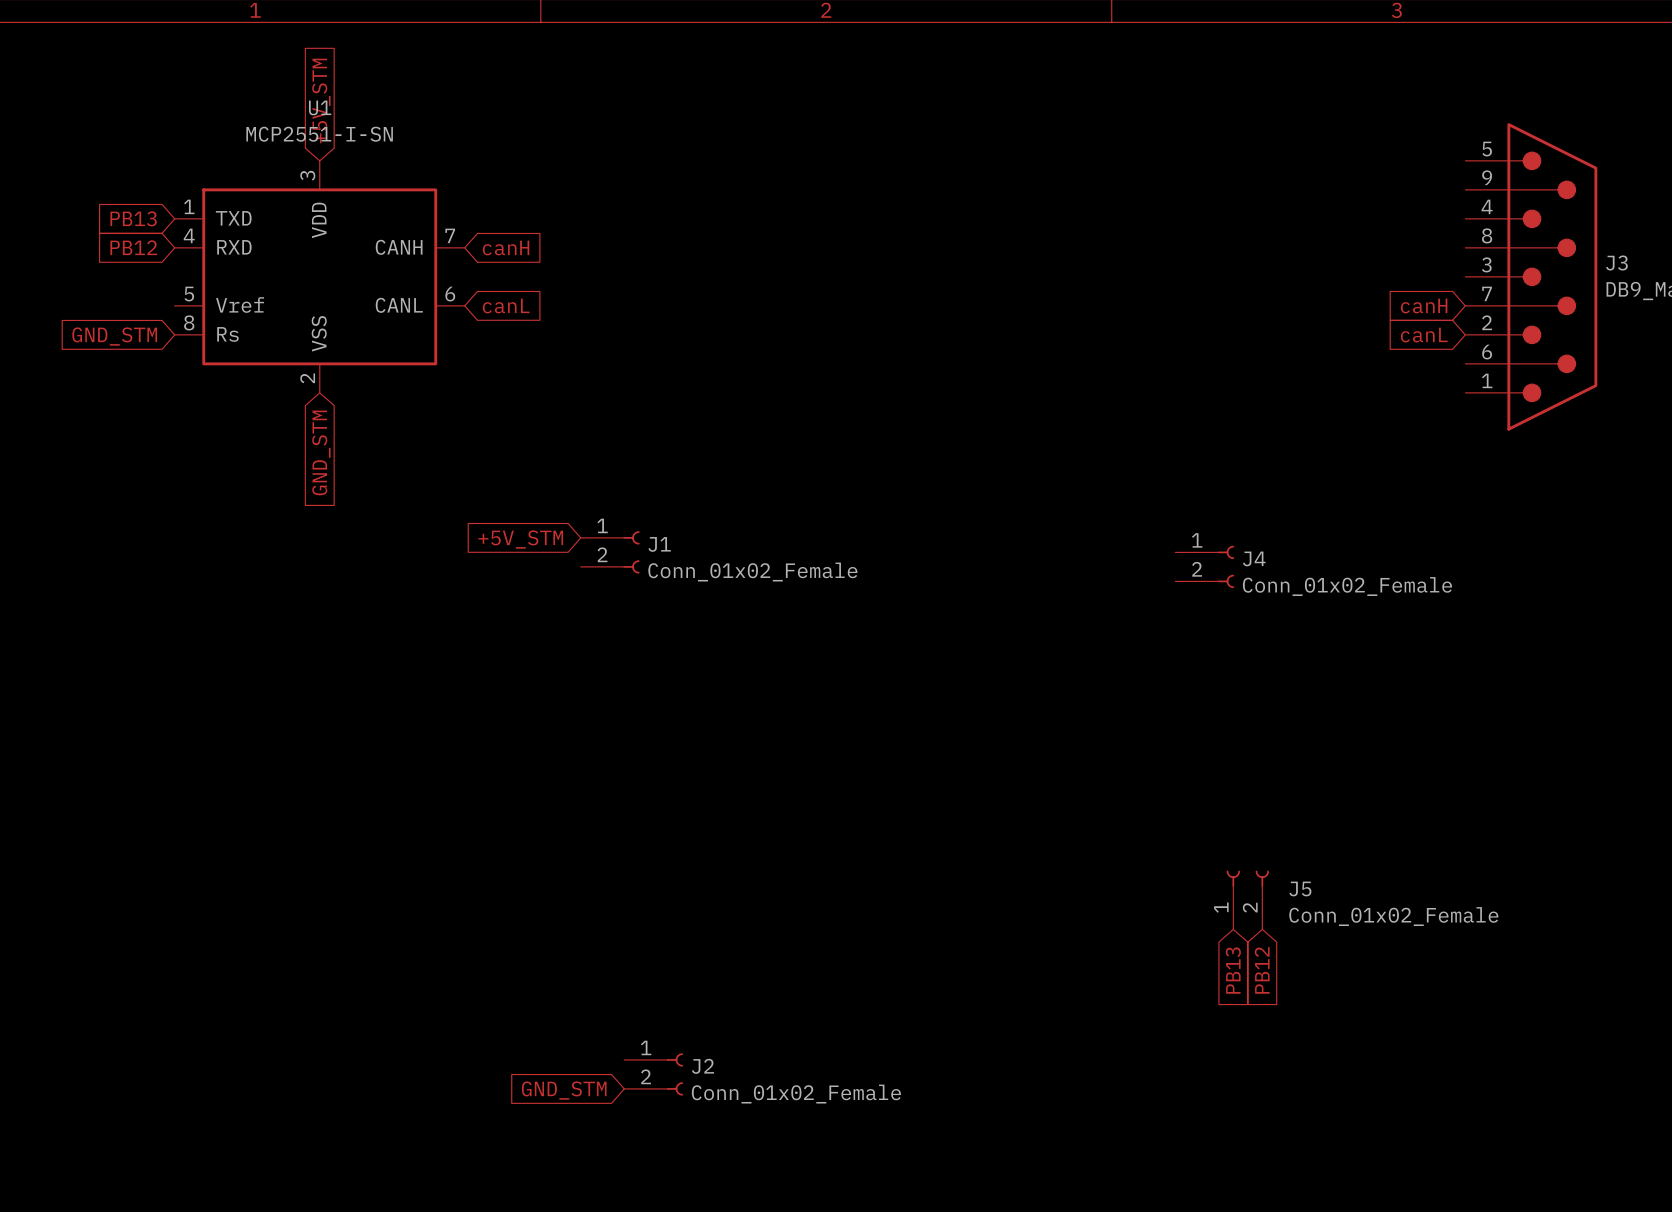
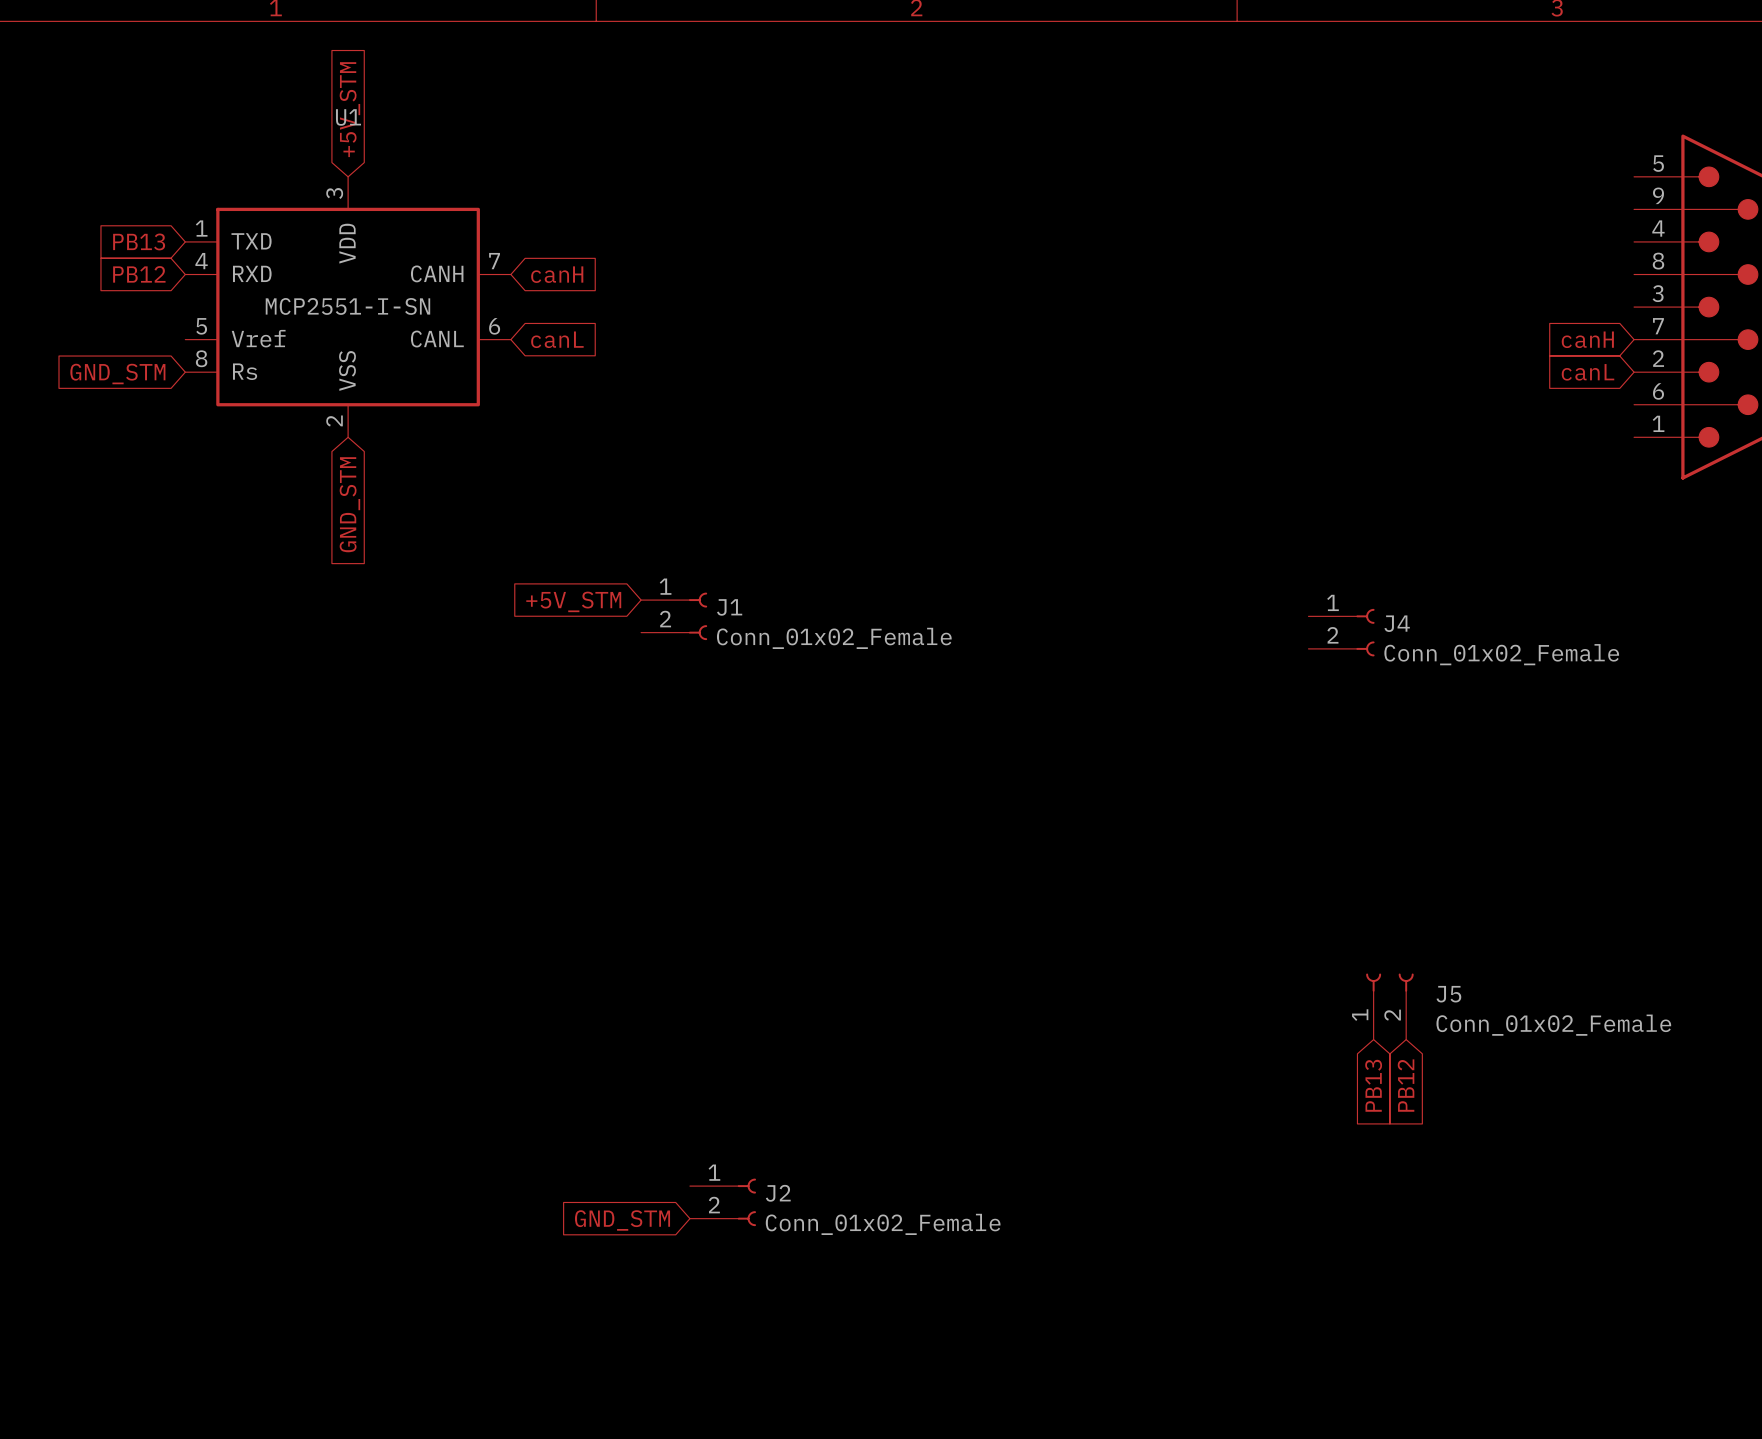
U1 value position: MCP2551-I-SN (319, 134) -> MCP2551-I-SN (347, 306)

